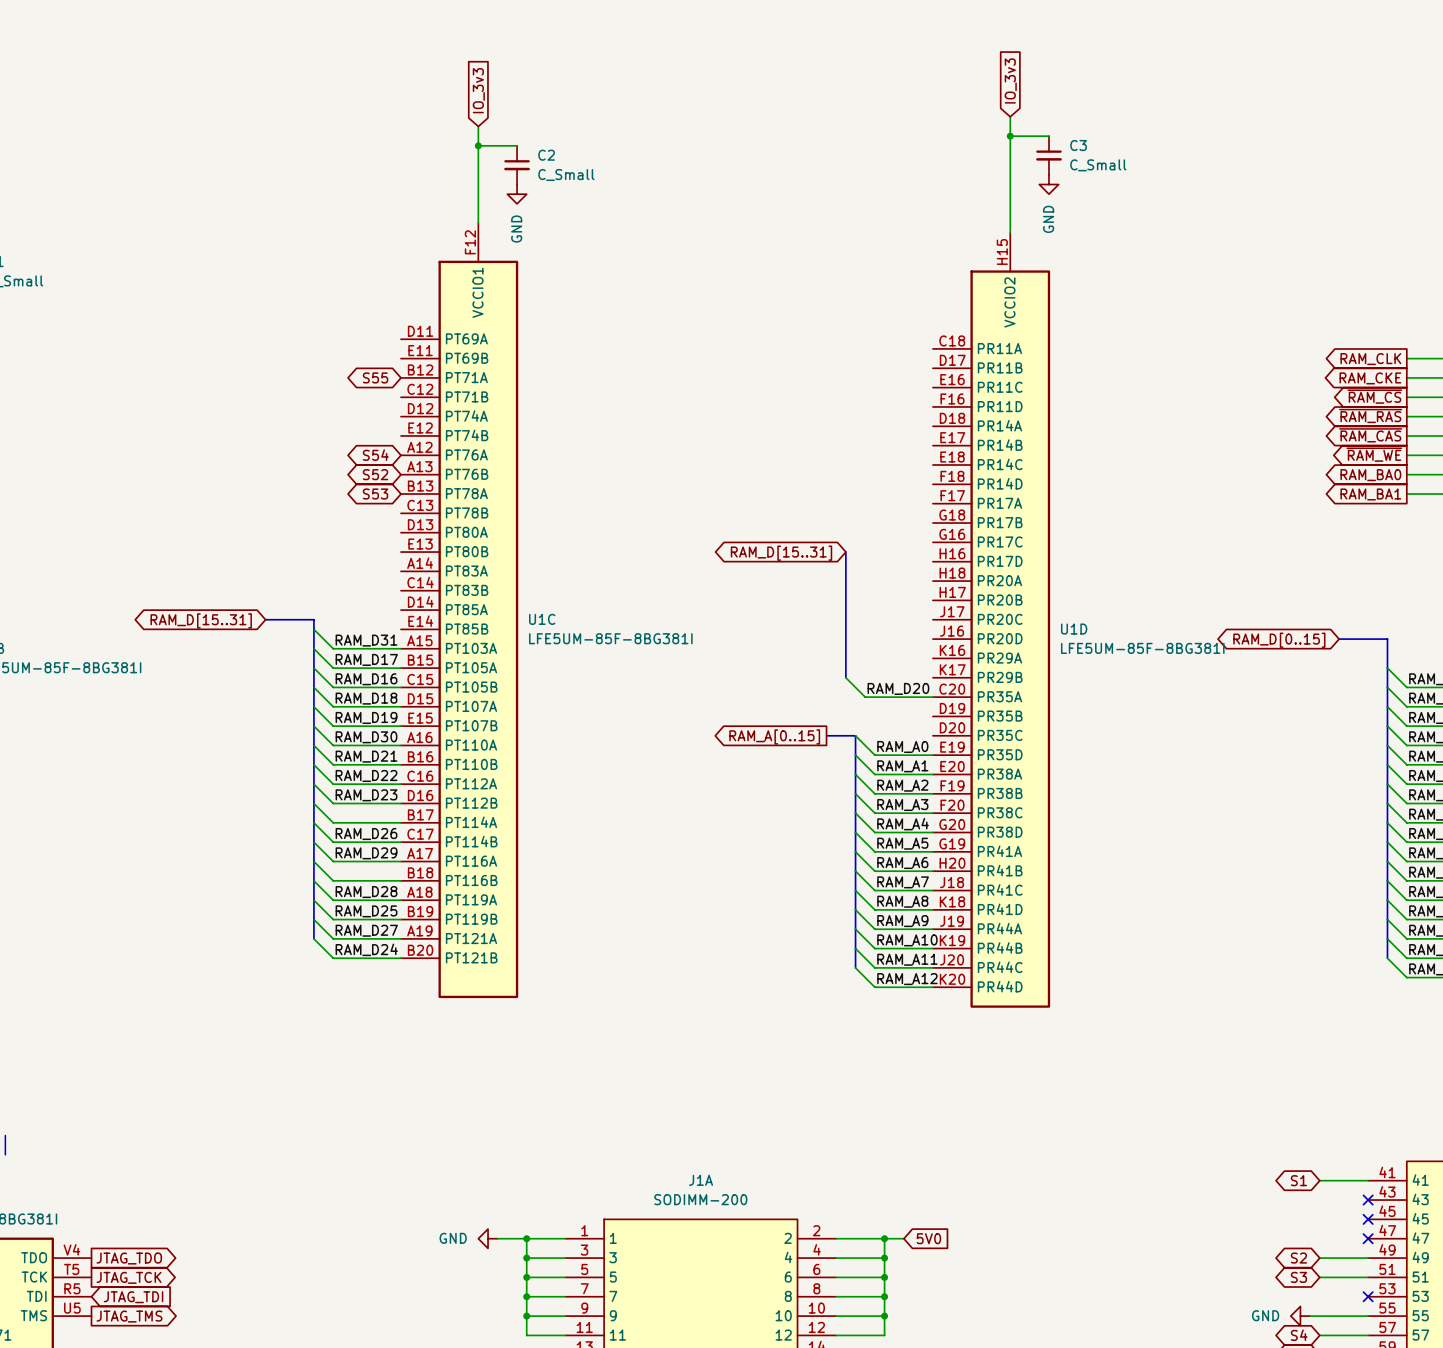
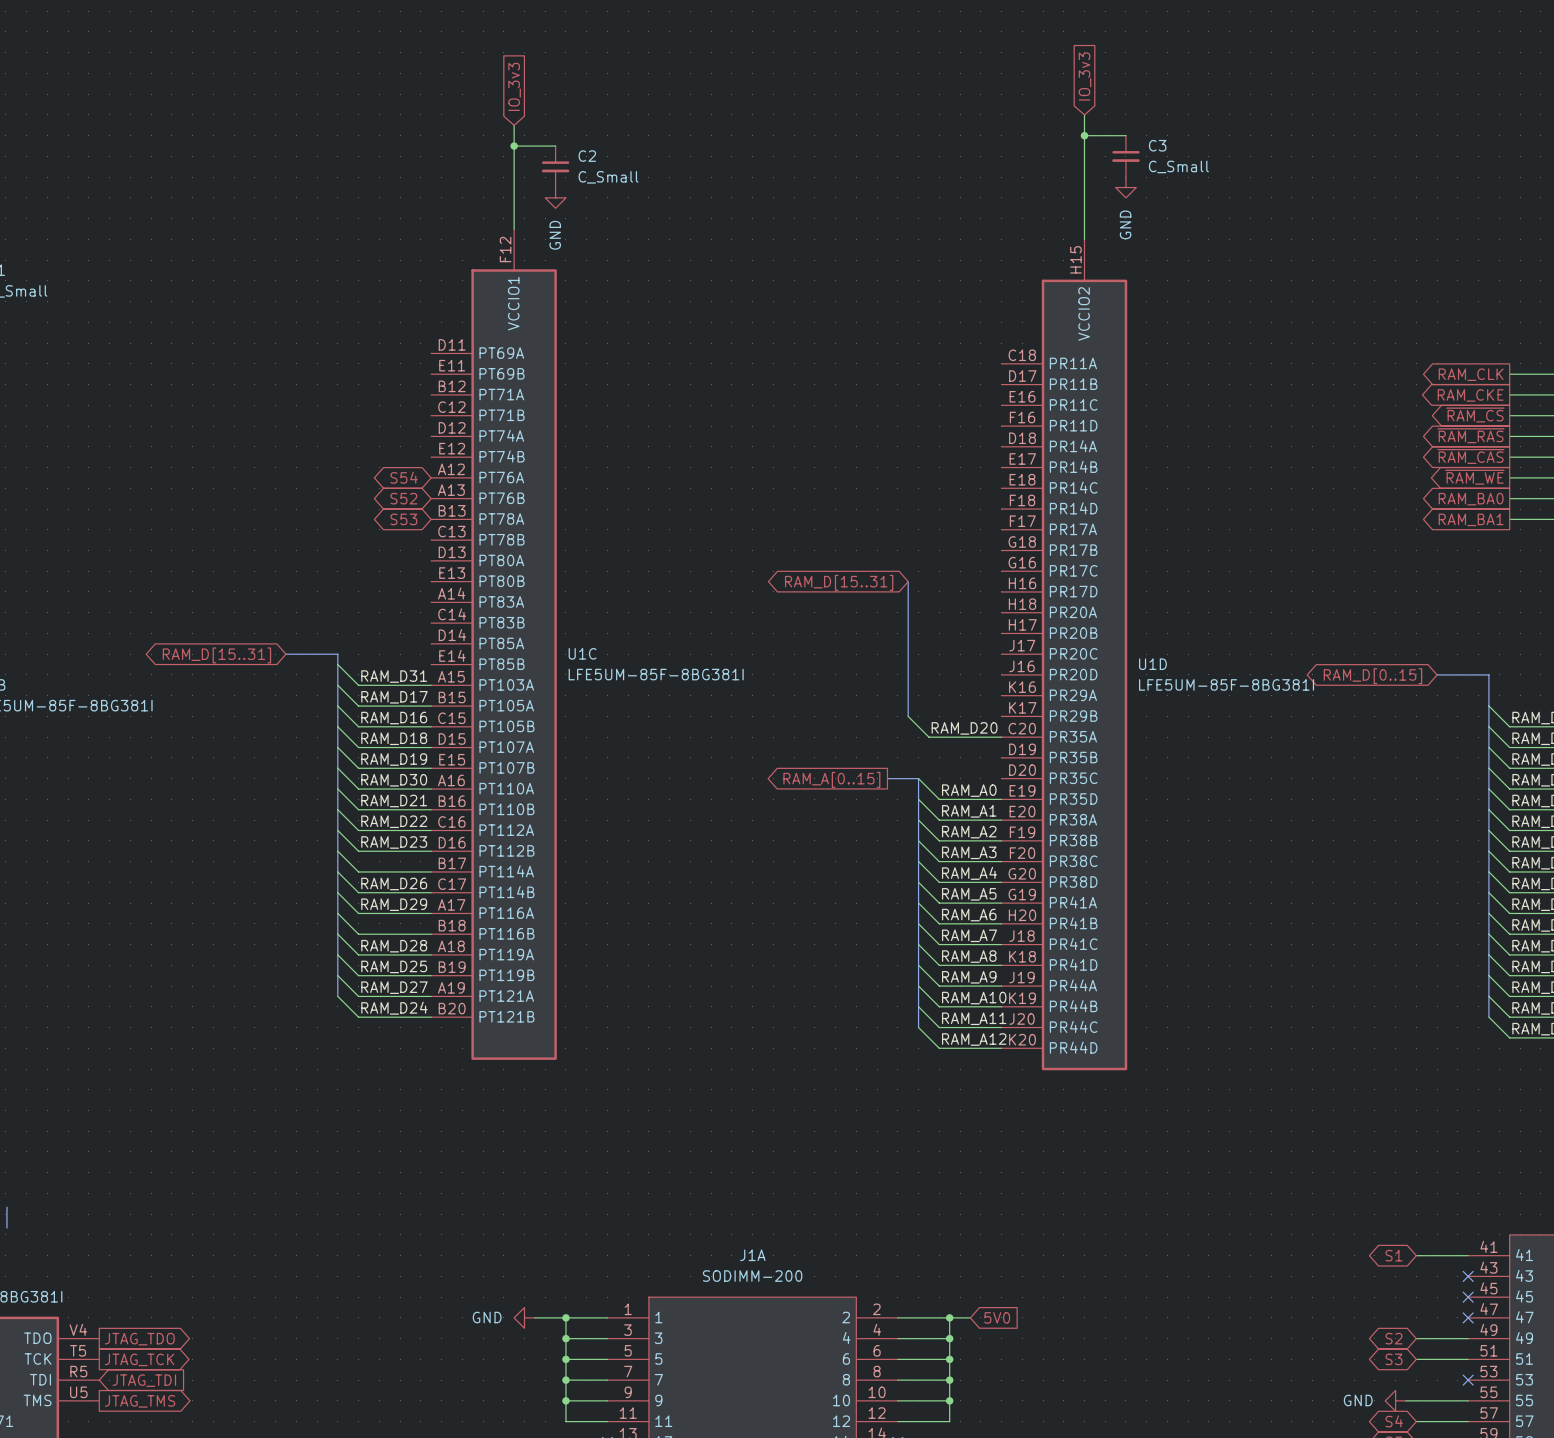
global label: S55 (375, 377) -> none

